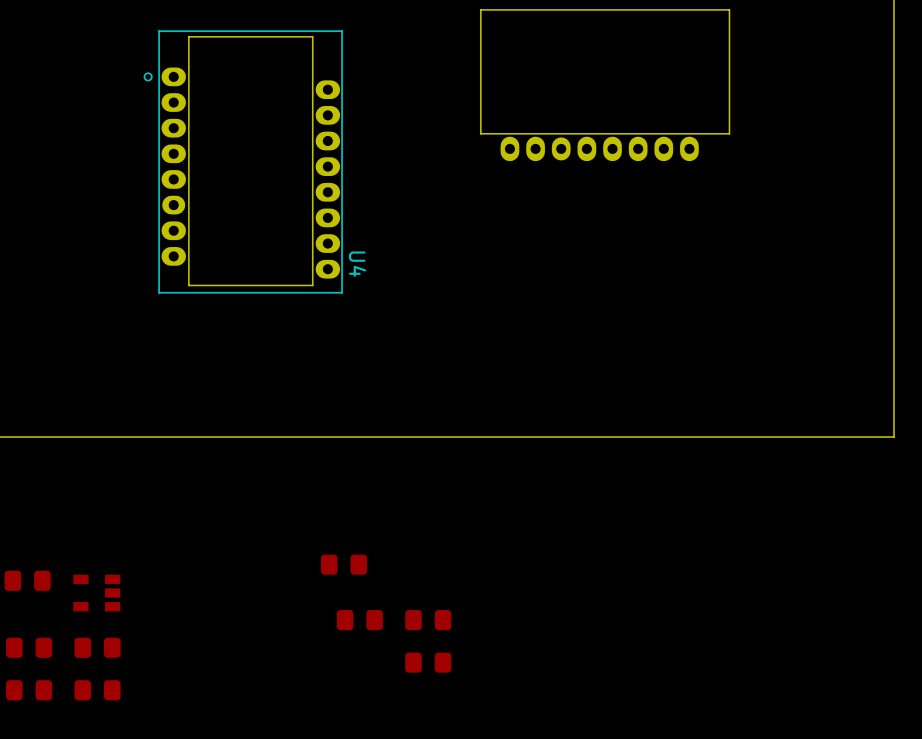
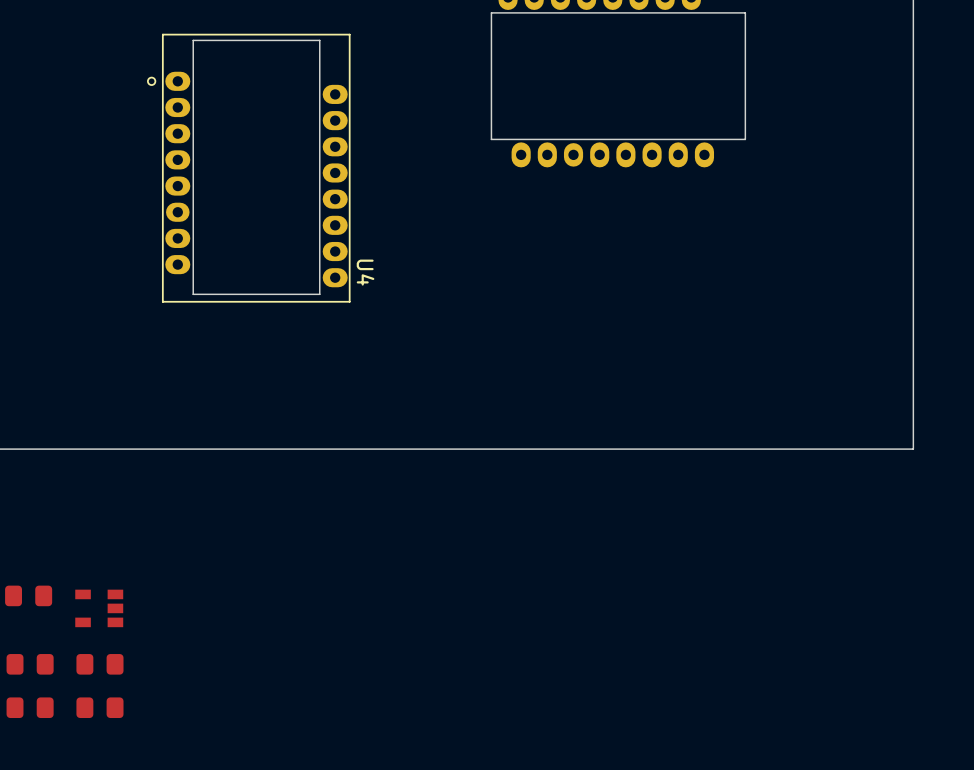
part: (344, 564) -> none
part: (359, 620) -> none
part: (428, 620) -> none
part: (428, 662) -> none

